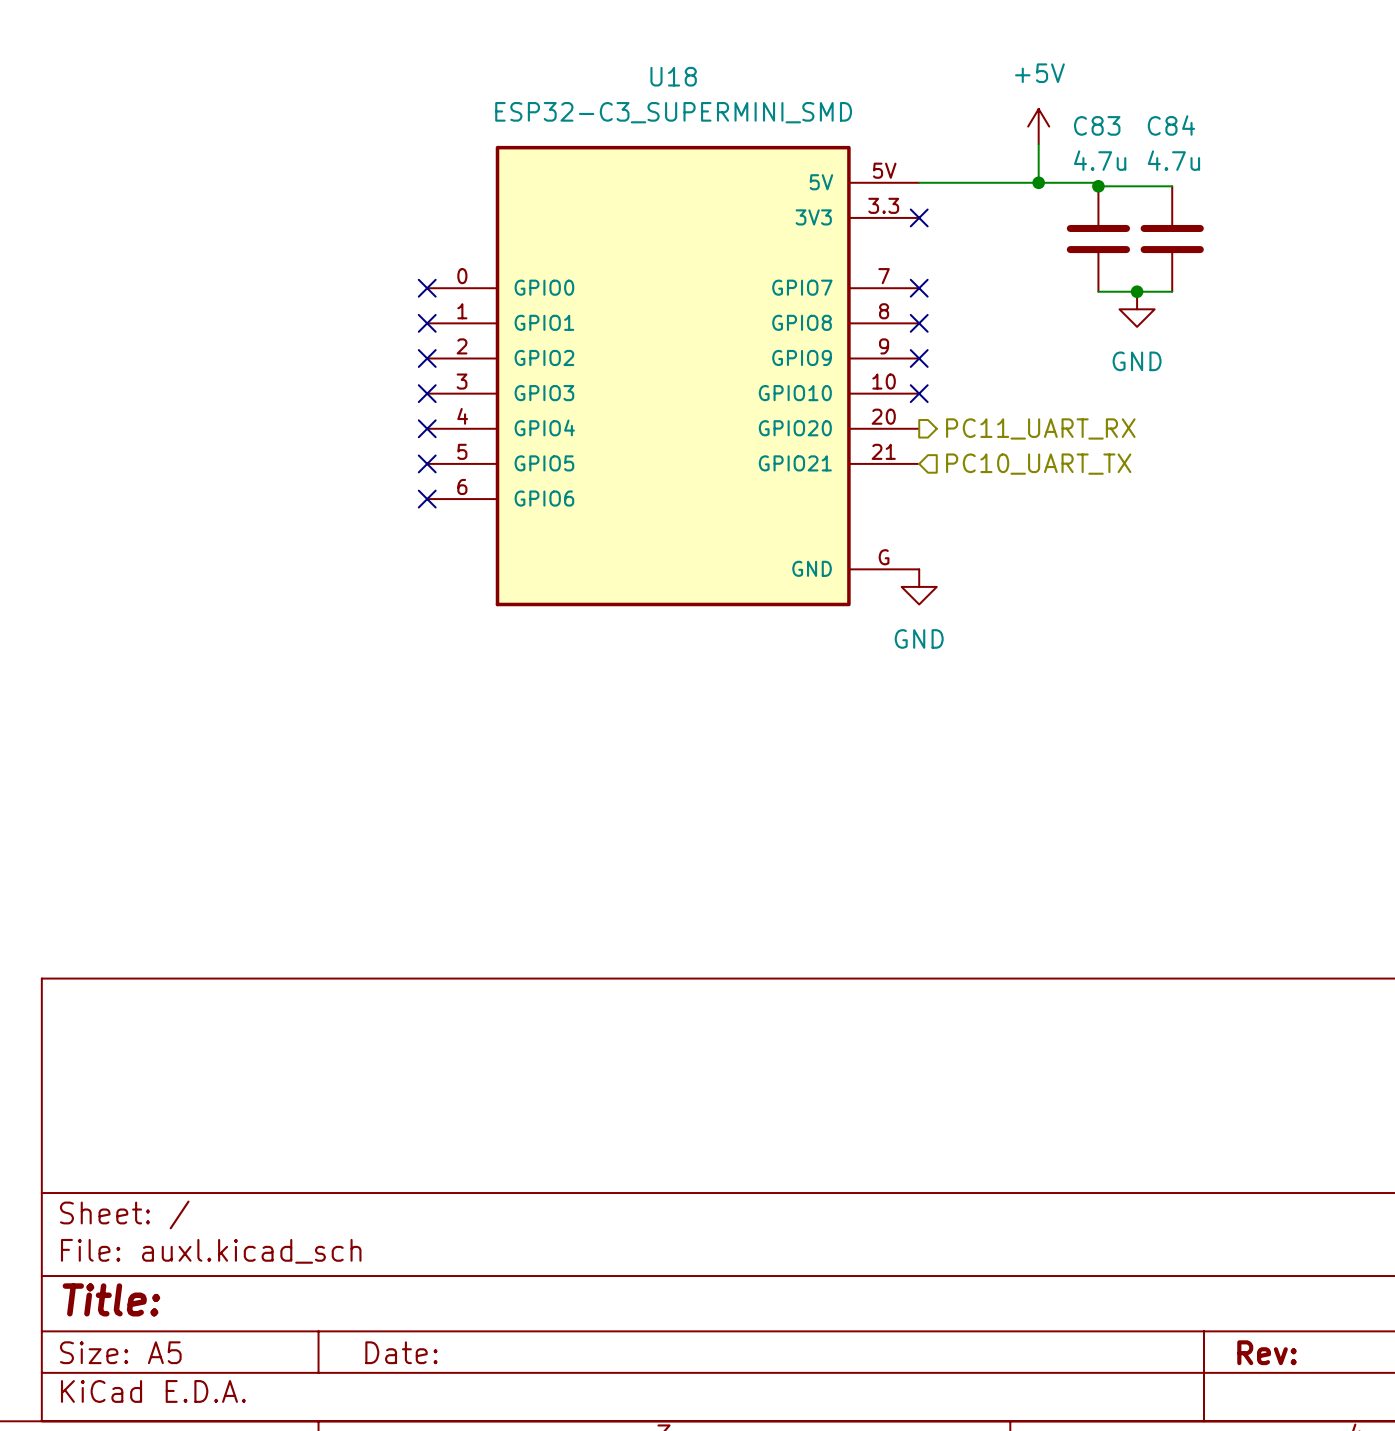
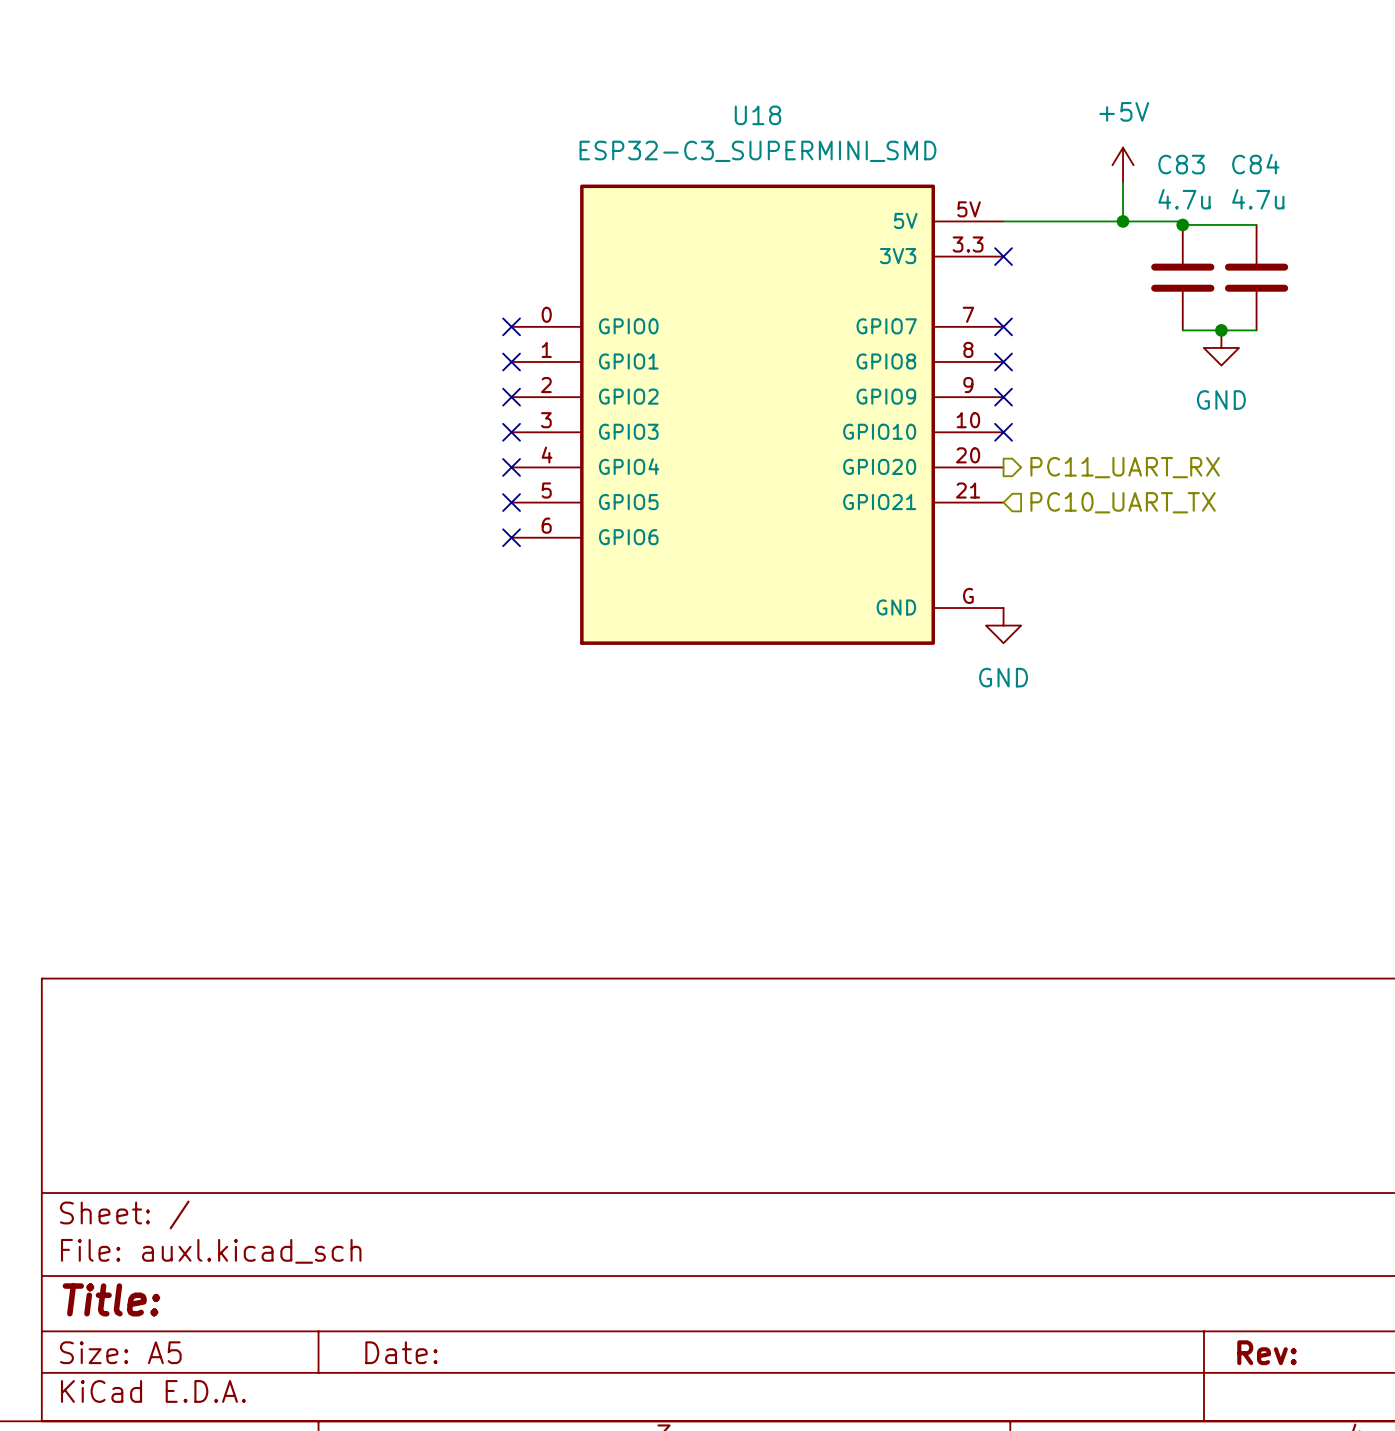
power symbol position: +5V (1038, 126) -> +5V (1123, 165)
wire: (1038, 144) (1038, 182) -> (1123, 182) (1123, 221)
wire: (919, 182) (1098, 182) (1098, 186) (1172, 186) -> (1003, 221) (1182, 221) (1182, 224) (1256, 224)
junction: (1038, 182) -> none
junction: (1098, 186) -> none
no-connect mark: (919, 217) -> none
junction: none -> (1123, 221)
junction: none -> (1182, 224)
C83 position: (1098, 239) -> (1182, 277)
C84 position: (1172, 239) -> (1256, 277)
no-connect mark: none -> (1003, 256)
no-connect mark: (427, 288) -> none
no-connect mark: (919, 288) -> none
wire: (1098, 291) (1172, 291) -> (1182, 330) (1256, 330)
junction: (1137, 291) -> none
power symbol position: GND (1137, 309) -> GND (1221, 347)
no-connect mark: (427, 323) -> none
no-connect mark: (919, 323) -> none
no-connect mark: none -> (511, 326)
no-connect mark: none -> (1003, 326)
junction: none -> (1221, 330)
no-connect mark: (427, 358) -> none
no-connect mark: (919, 358) -> none
no-connect mark: none -> (511, 362)
no-connect mark: none -> (1003, 362)
U18 position: (673, 376) -> (757, 414)
no-connect mark: (427, 393) -> none
no-connect mark: (919, 393) -> none
no-connect mark: none -> (511, 397)
no-connect mark: none -> (1003, 397)
no-connect mark: (427, 428) -> none
hierarchical label position: PC11_UART_RX (1040, 428) -> PC11_UART_RX (1125, 467)
no-connect mark: none -> (511, 432)
no-connect mark: none -> (1003, 432)
no-connect mark: (427, 463) -> none
hierarchical label position: PC10_UART_TX (1038, 464) -> PC10_UART_TX (1123, 502)
no-connect mark: none -> (511, 467)
no-connect mark: (427, 499) -> none
no-connect mark: none -> (511, 502)
no-connect mark: none -> (511, 537)
power symbol position: GND (919, 586) -> GND (1003, 625)

